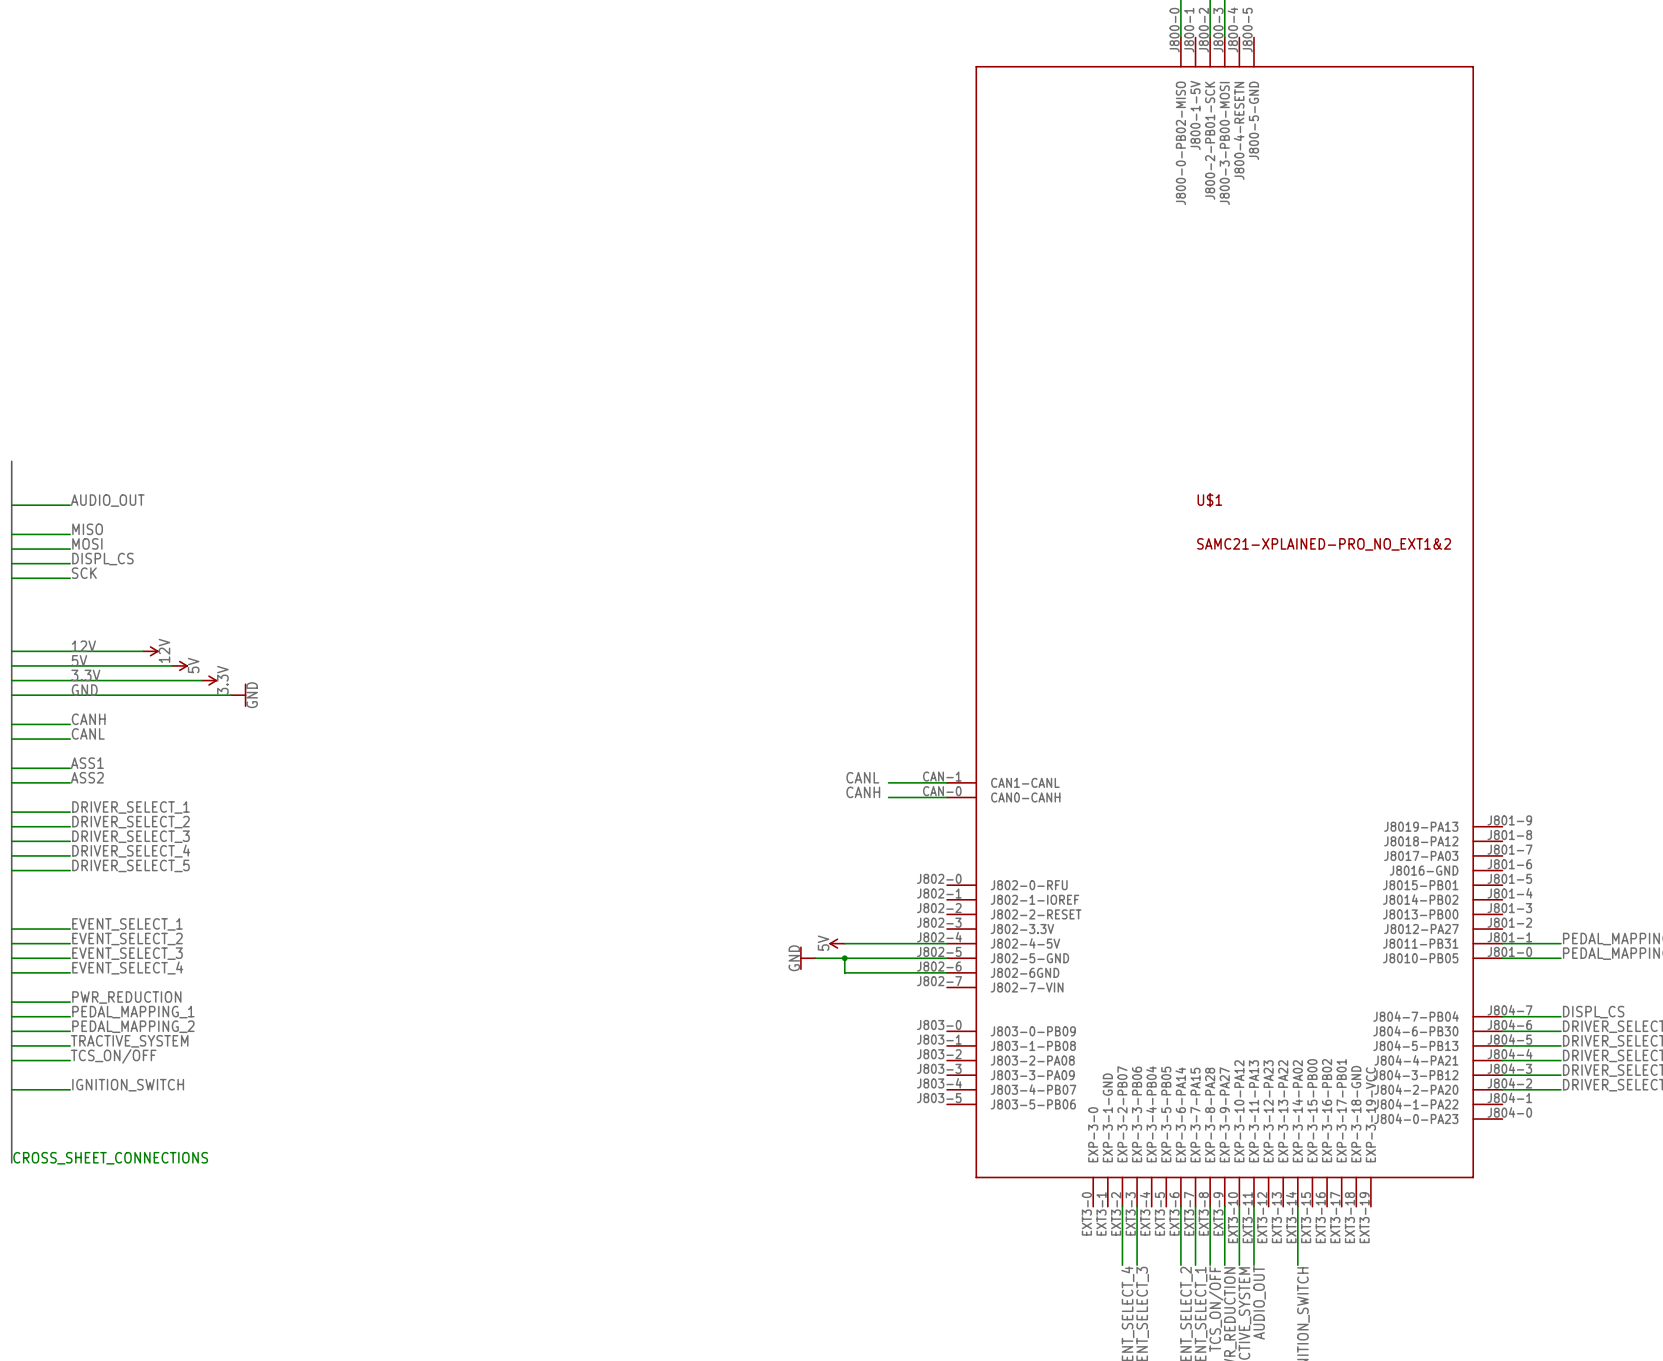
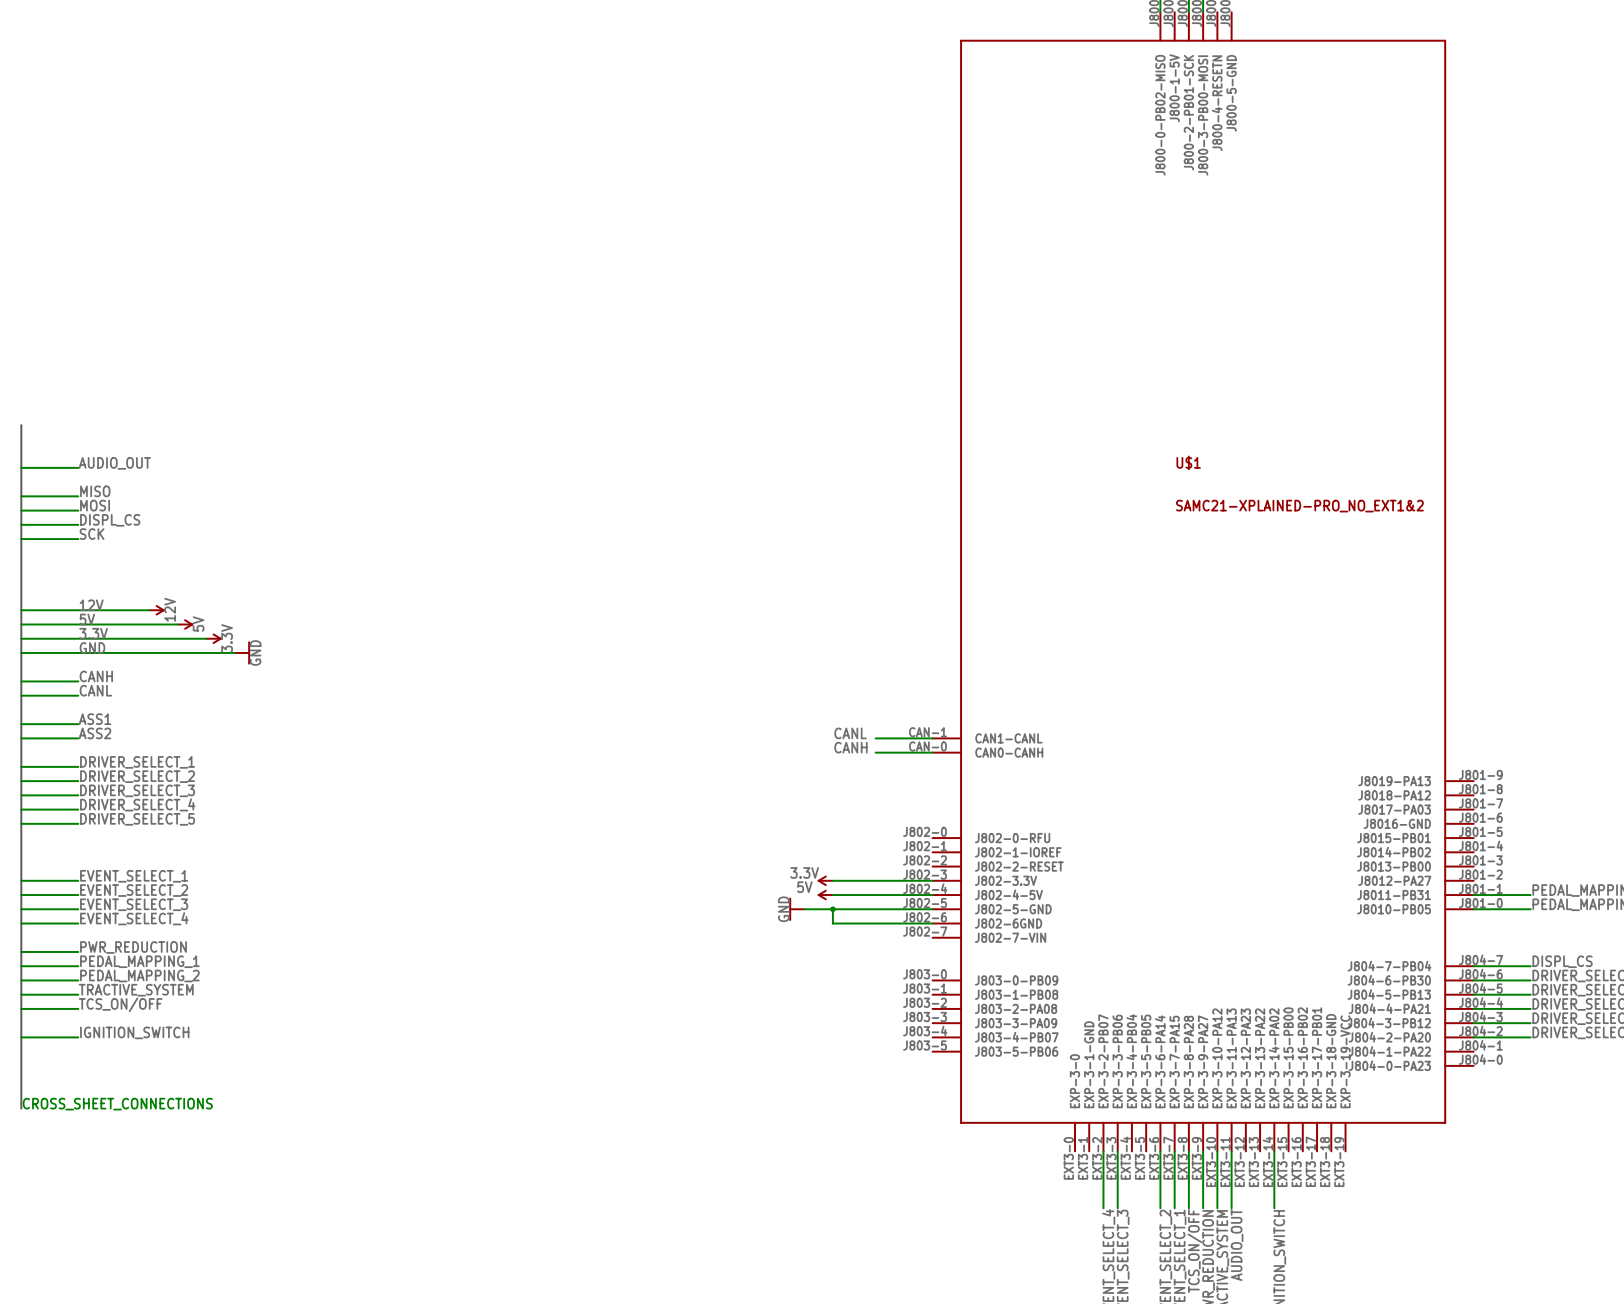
power symbol: none -> 3.3V (825, 880)
wire: none -> (832, 880) (932, 880)
power symbol text rotation: 0° (823, 943) -> 90° clockwise (804, 887)

